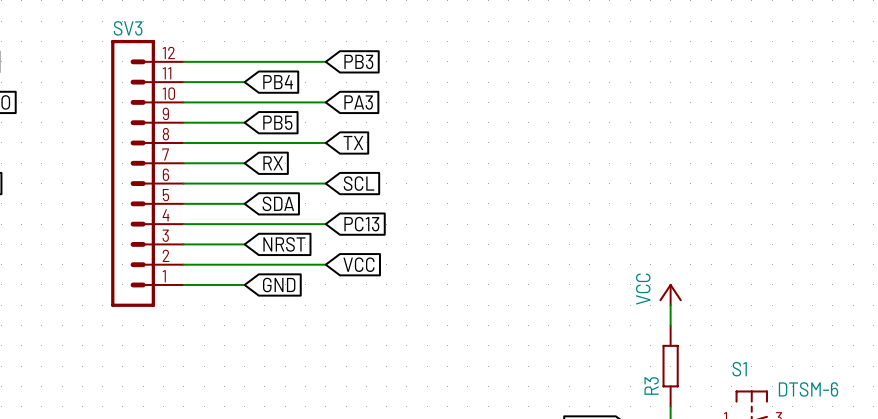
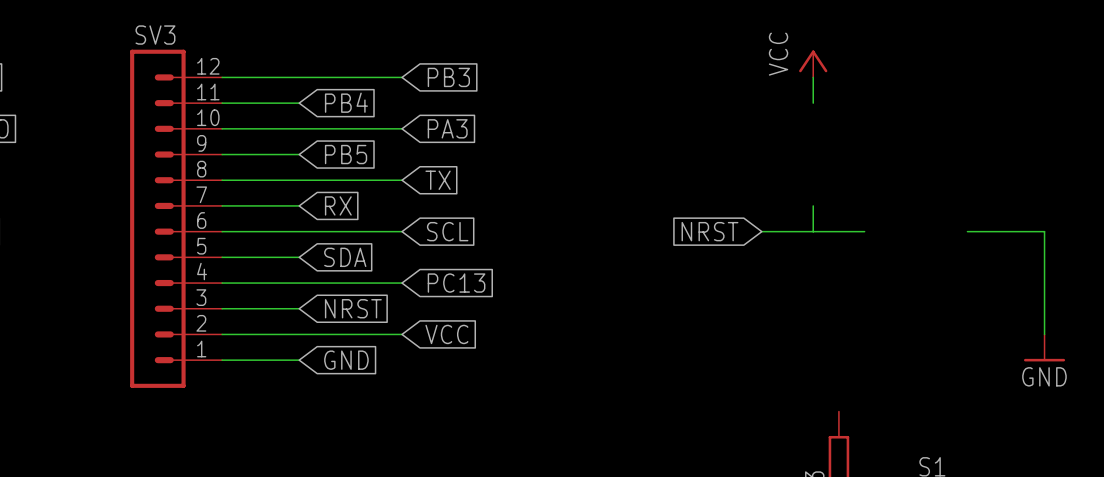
power symbol: none -> VCC (813, 63)
wire: none -> (813, 77) (813, 103)
global label: none -> NRST (710, 231)
wire: none -> (761, 231) (864, 231)
wire: none -> (967, 231) (1044, 231) (1044, 334)
power symbol: none -> GND (1044, 347)
power symbol: VCC (670, 294) -> none
wire: (670, 305) (670, 325) -> (813, 205) (813, 231)

